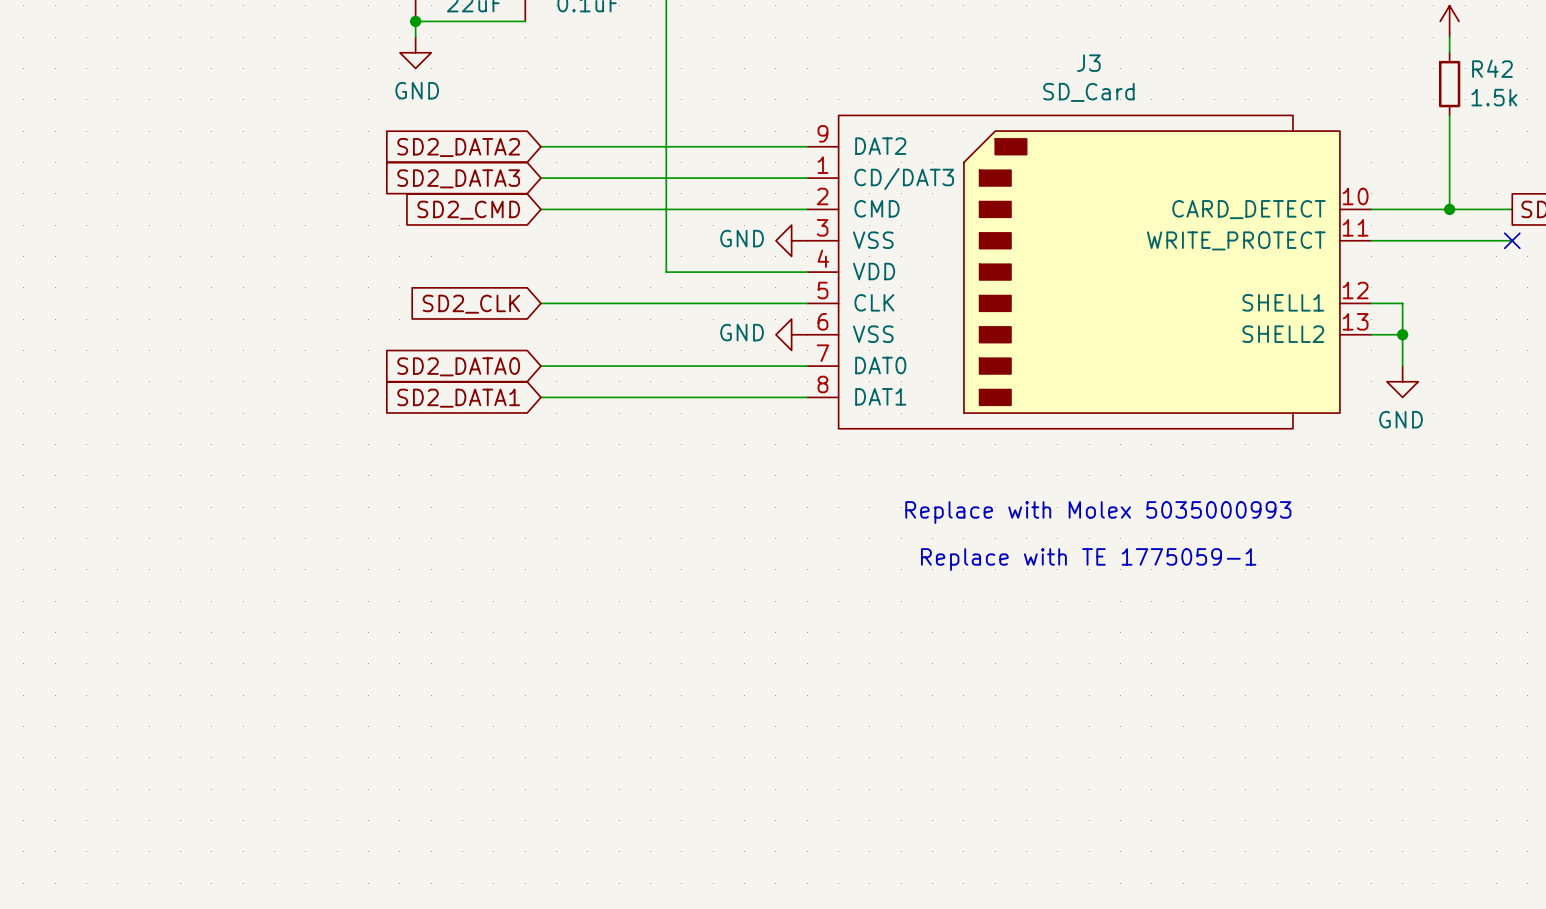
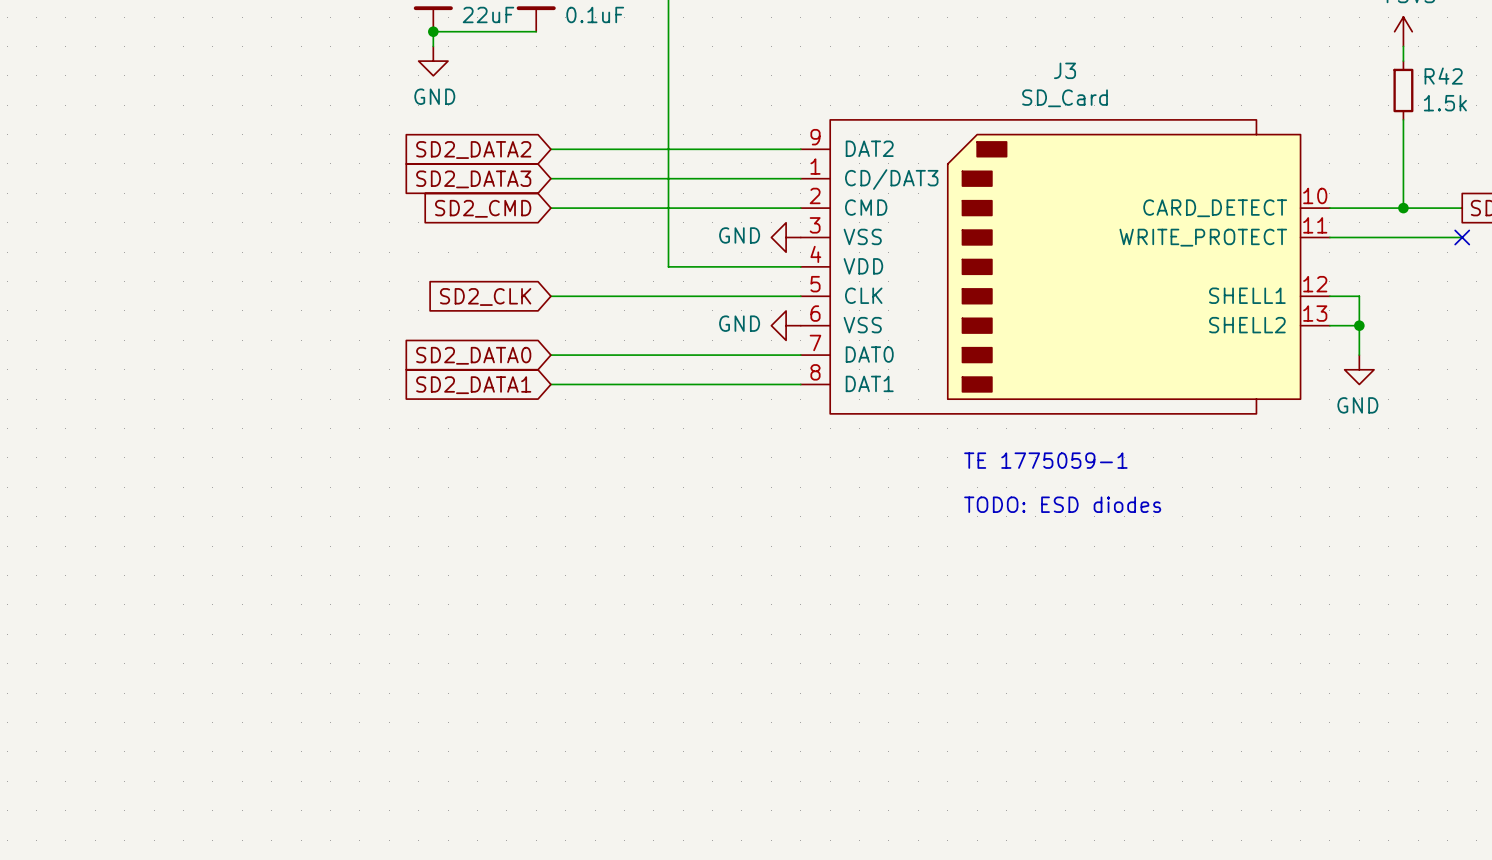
text: none -> TE 1775059-1 (1045, 460)
text: Replace with Molex 5035000993 (1098, 512) -> none
text: none -> TODO: ESD diodes (1062, 504)
text: Replace with TE 1775059-1 (1088, 559) -> none

